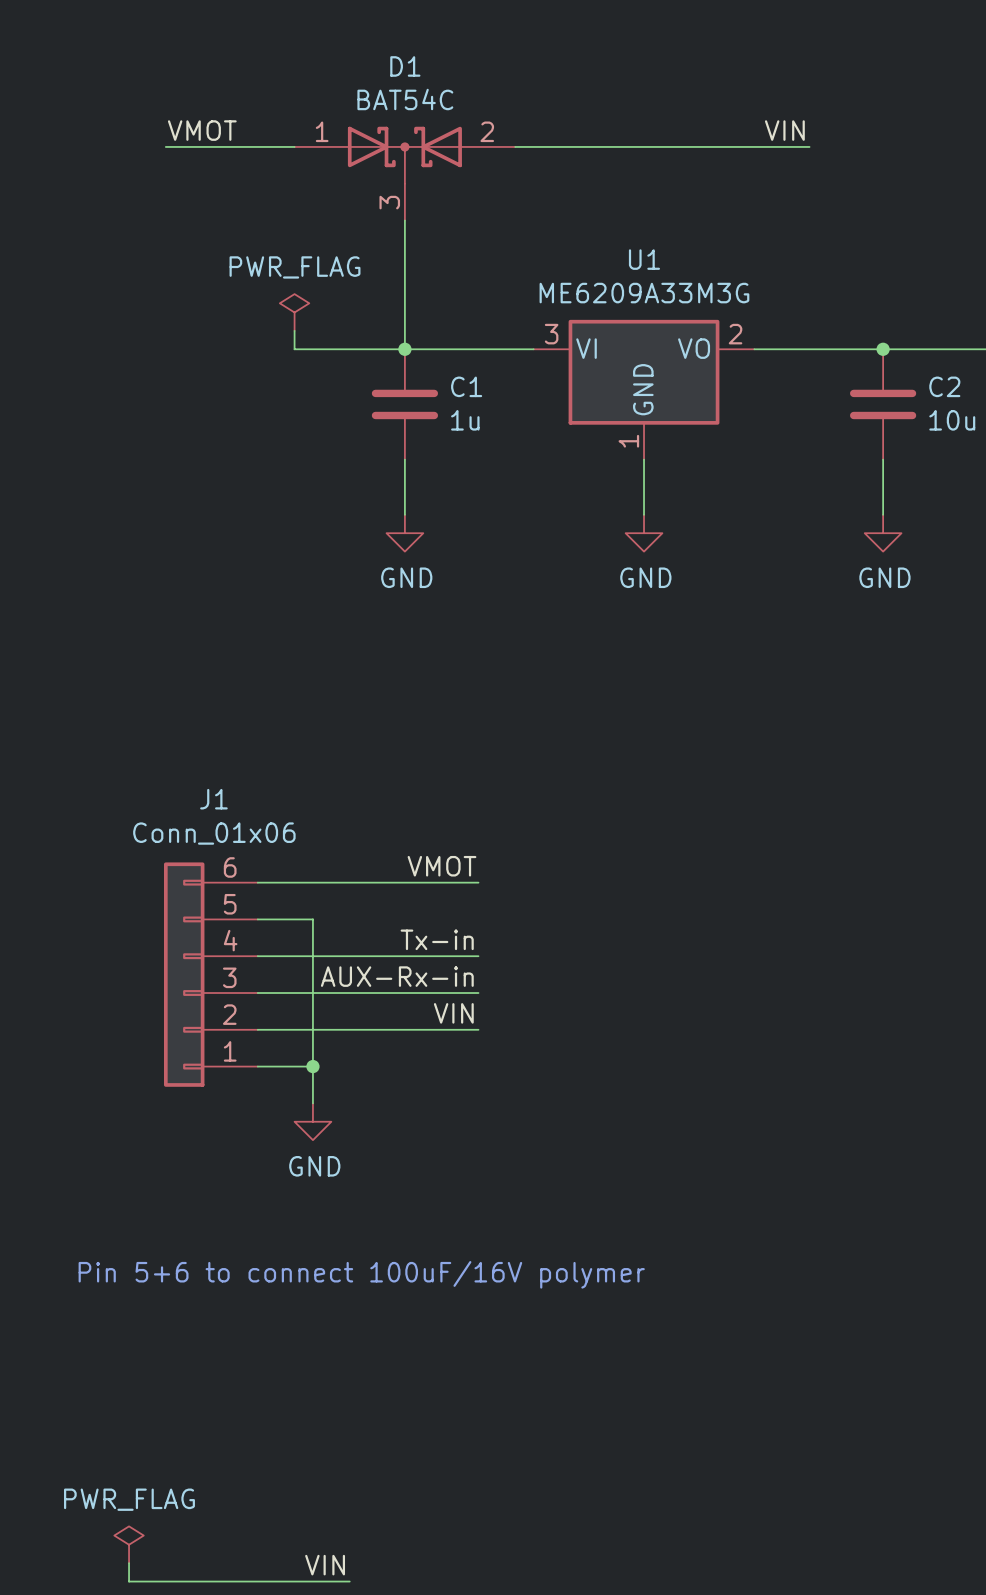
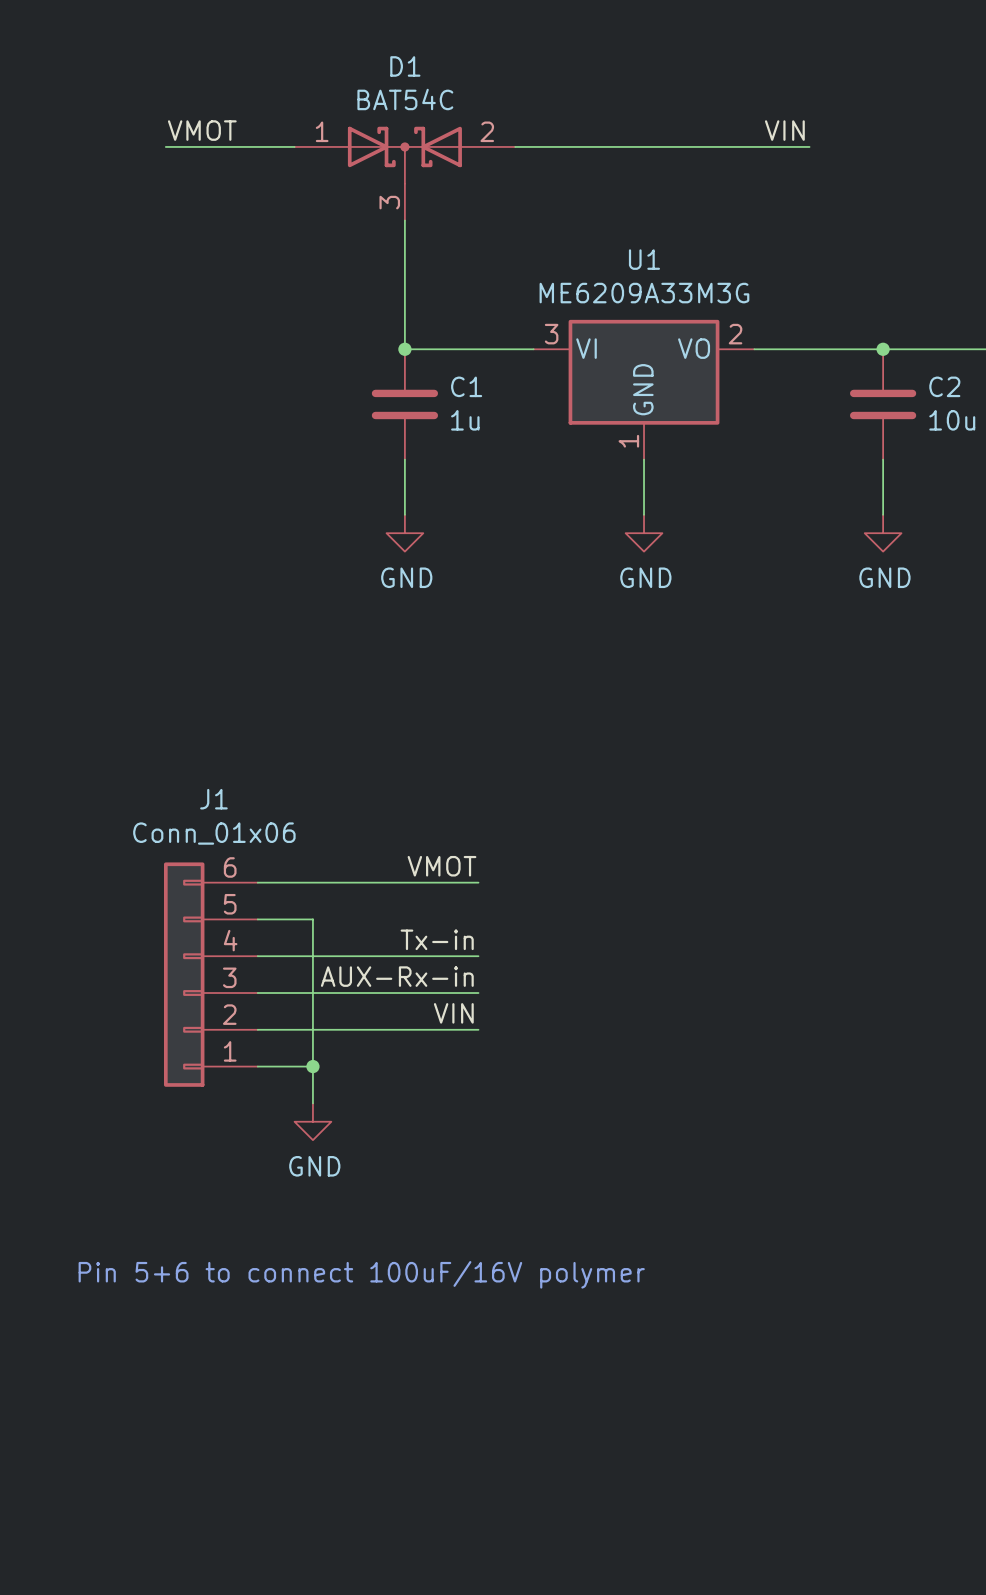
power symbol: PWR_FLAG (294, 312) -> none
wire: (294, 330) (294, 349) (404, 349) -> none
power symbol: PWR_FLAG (129, 1544) -> none
wire: (129, 1563) (129, 1581) (349, 1581) -> none
label: VIN (325, 1565) -> none

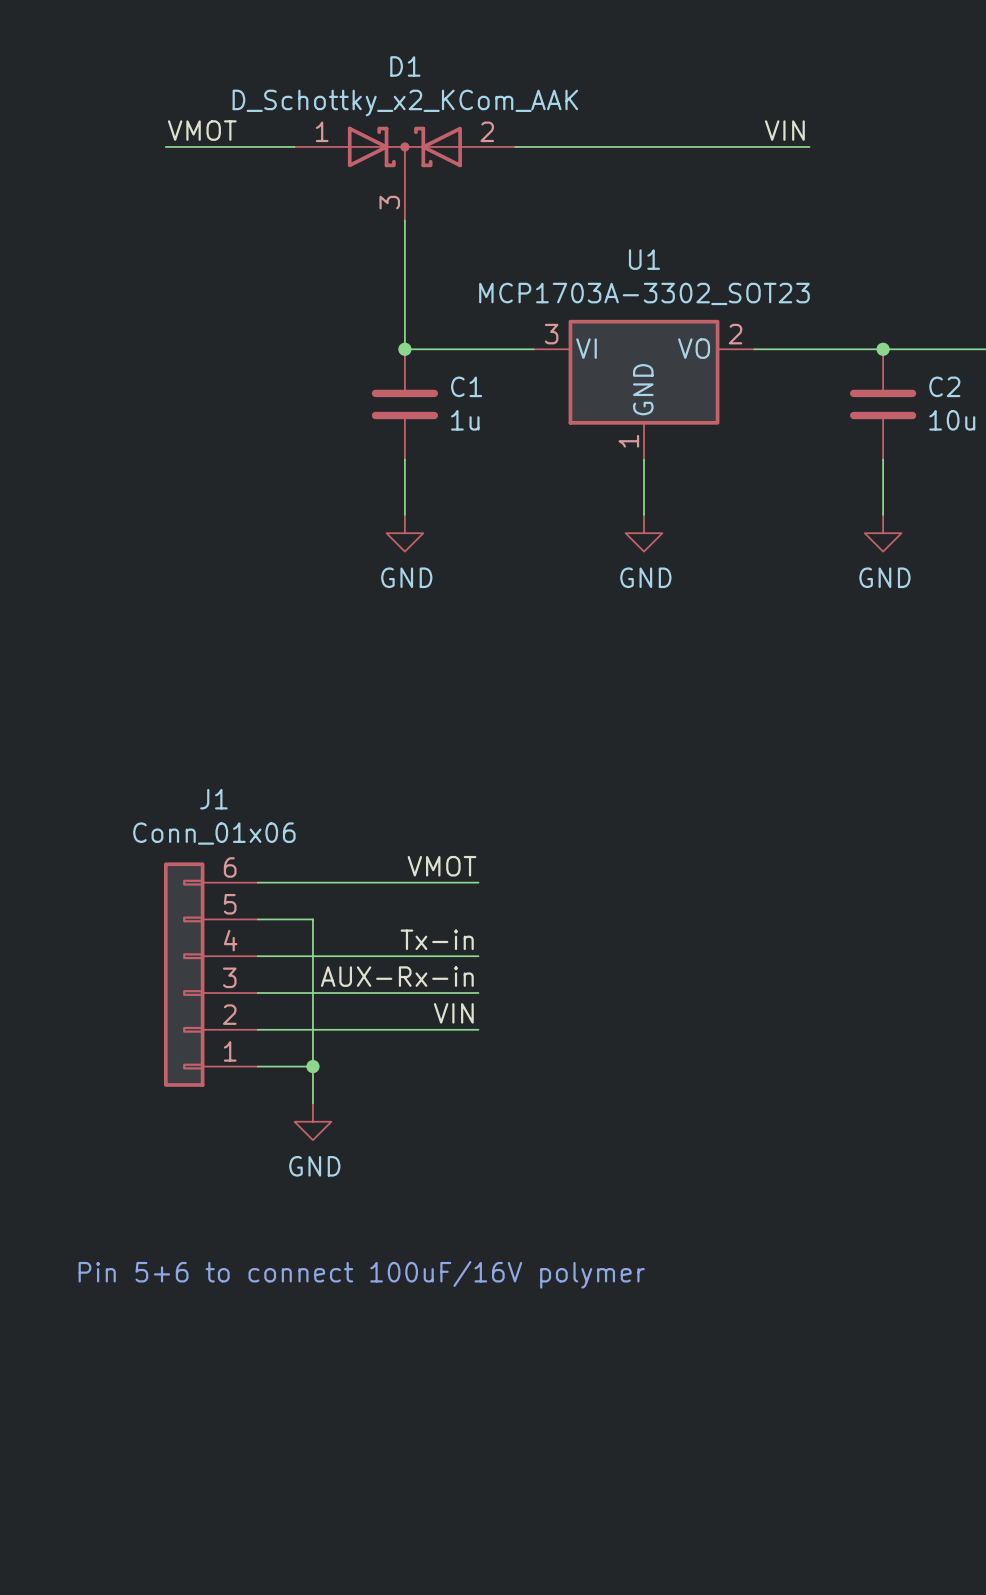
D1 value: BAT54C (405, 99) -> D_Schottky_x2_KCom_AAK (405, 103)
U1 value: ME6209A33M3G (644, 293) -> MCP1703A-3302_SOT23 (644, 293)

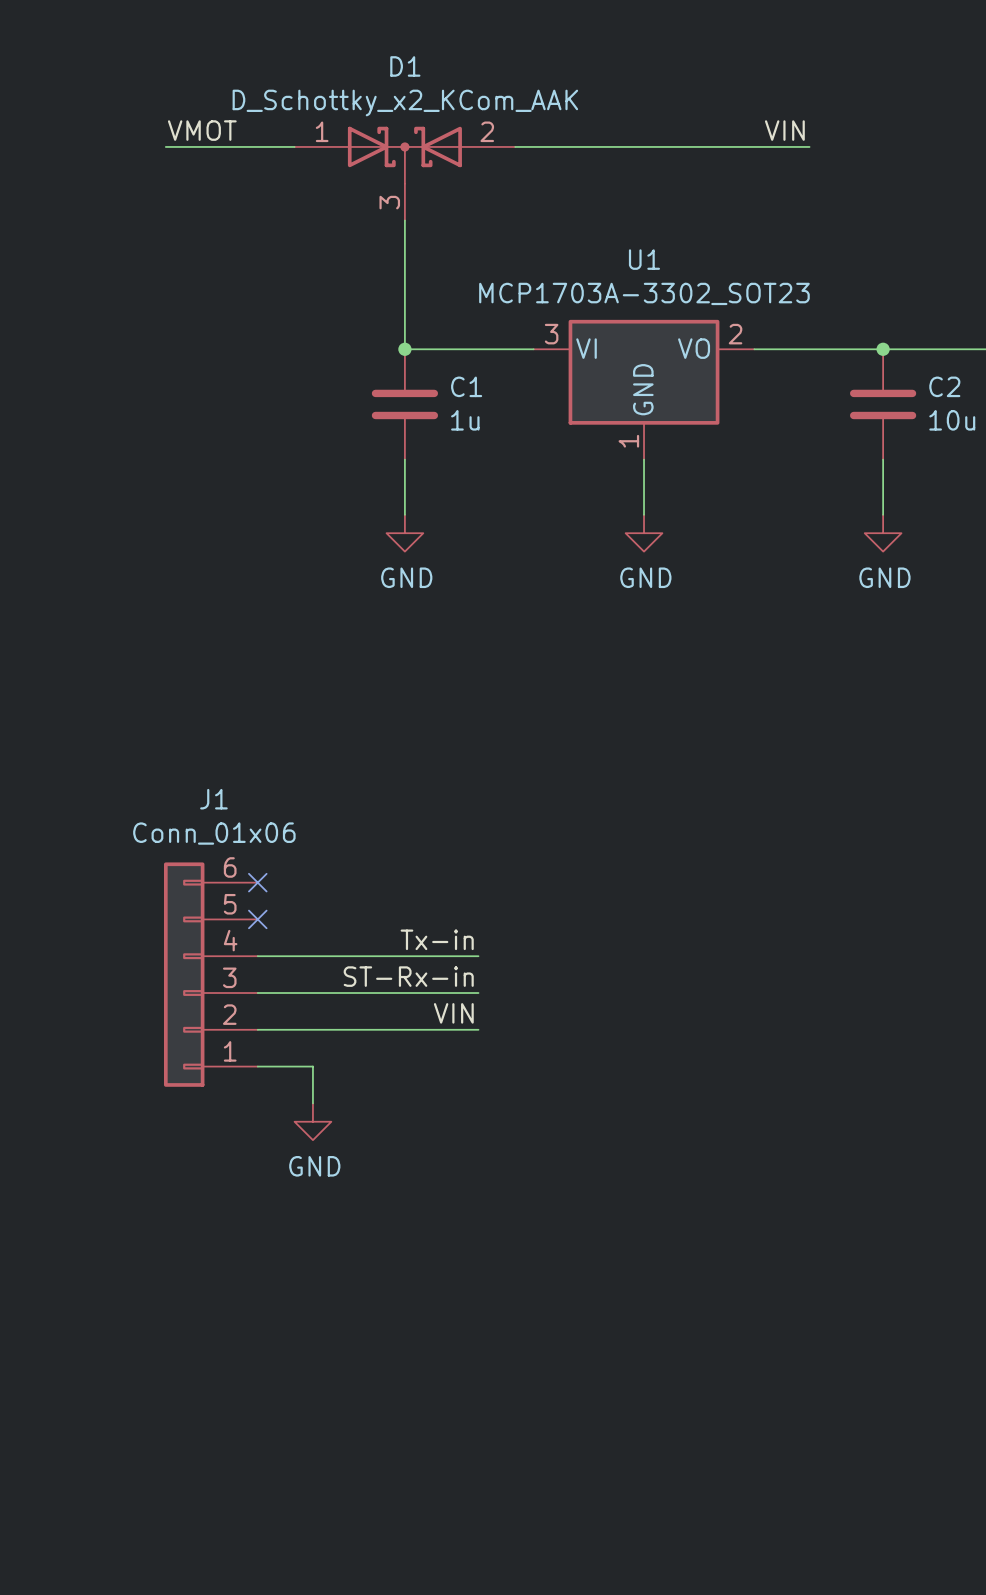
label: VMOT (442, 866) -> none
wire: (257, 882) (478, 882) -> none
no-connect mark: none -> (257, 882)
wire: (257, 919) (312, 919) (312, 1066) -> none
no-connect mark: none -> (257, 919)
label: AUX-Rx-in (397, 976) -> ST-Rx-in (408, 976)
junction: (312, 1066) -> none
text: Pin 5+6 to connect 100uF/16V polymer (361, 1274) -> none

